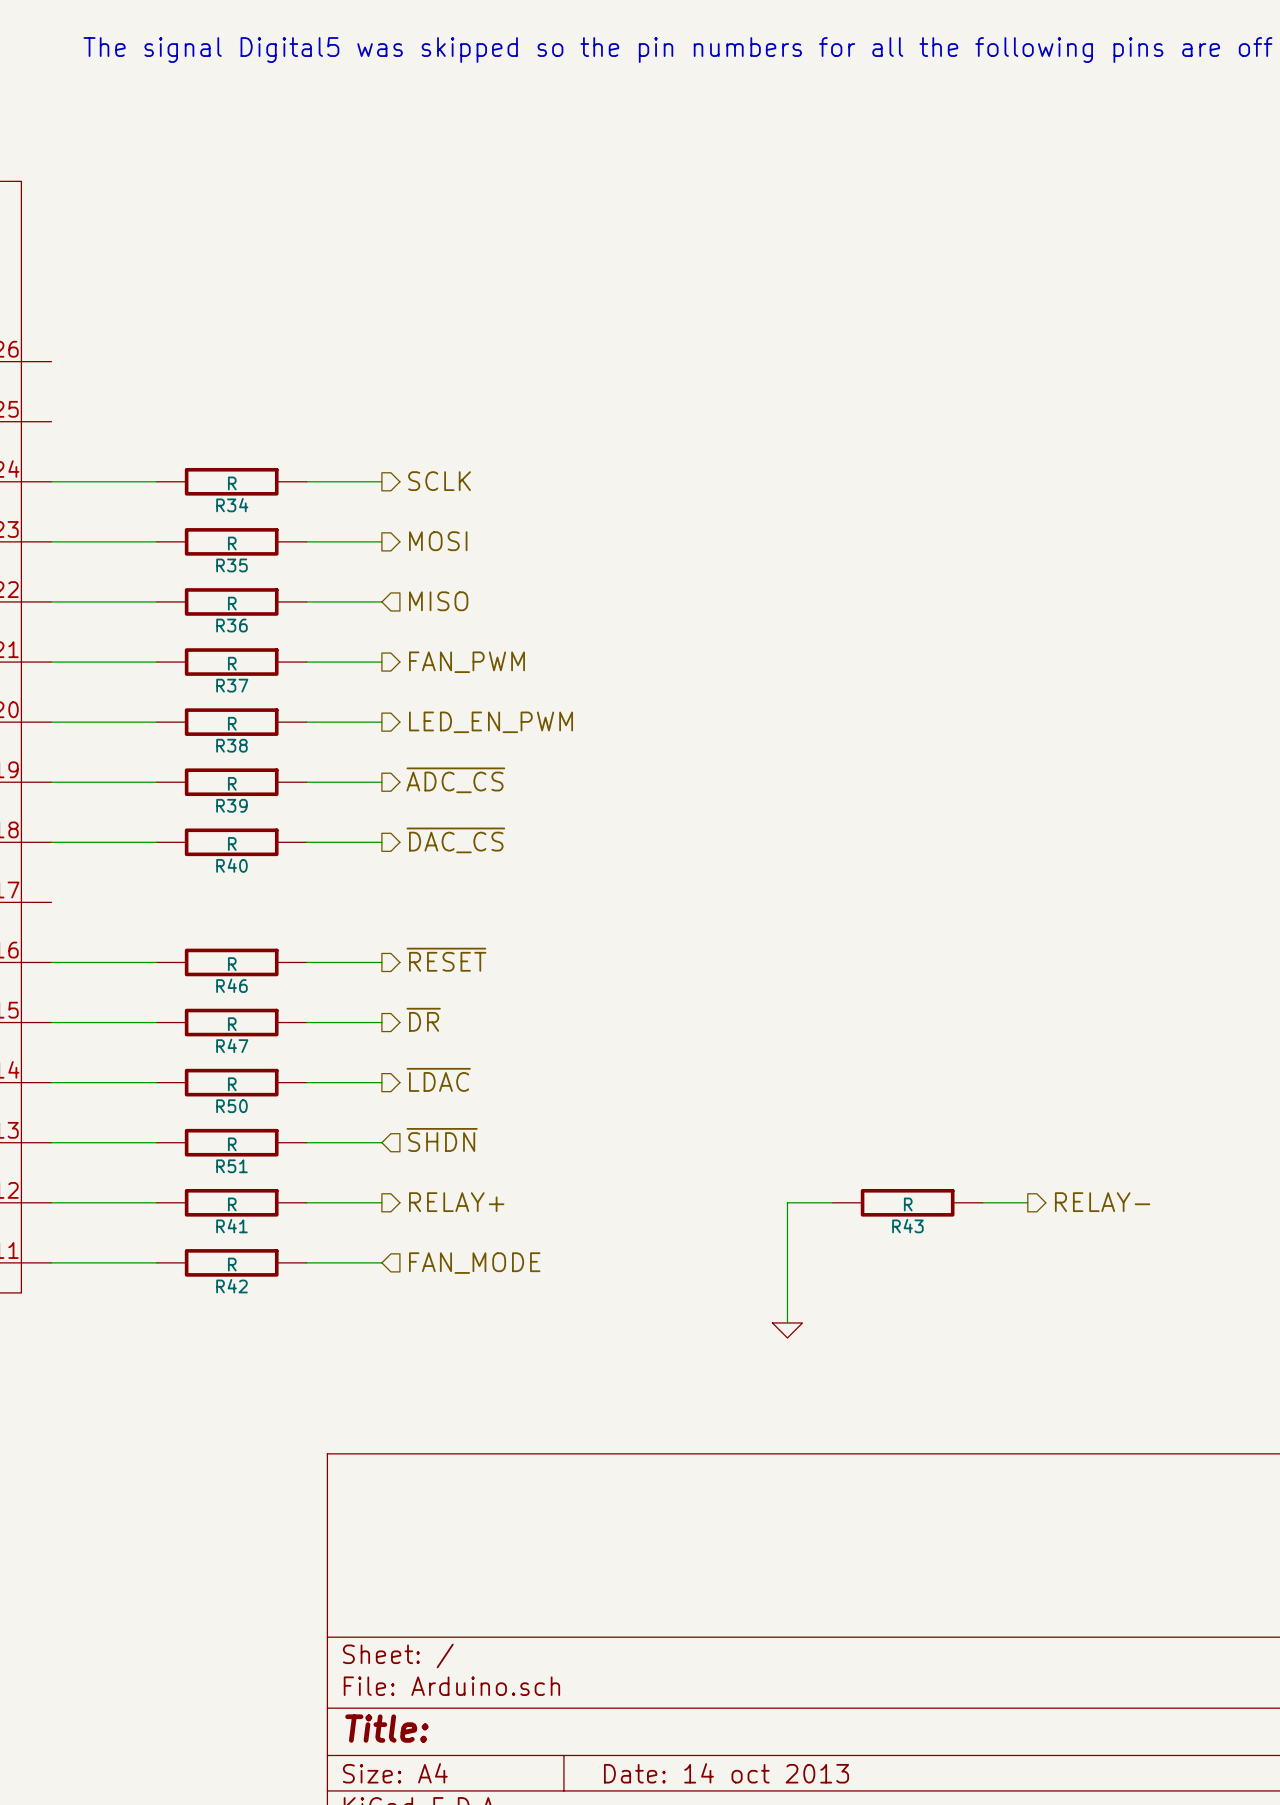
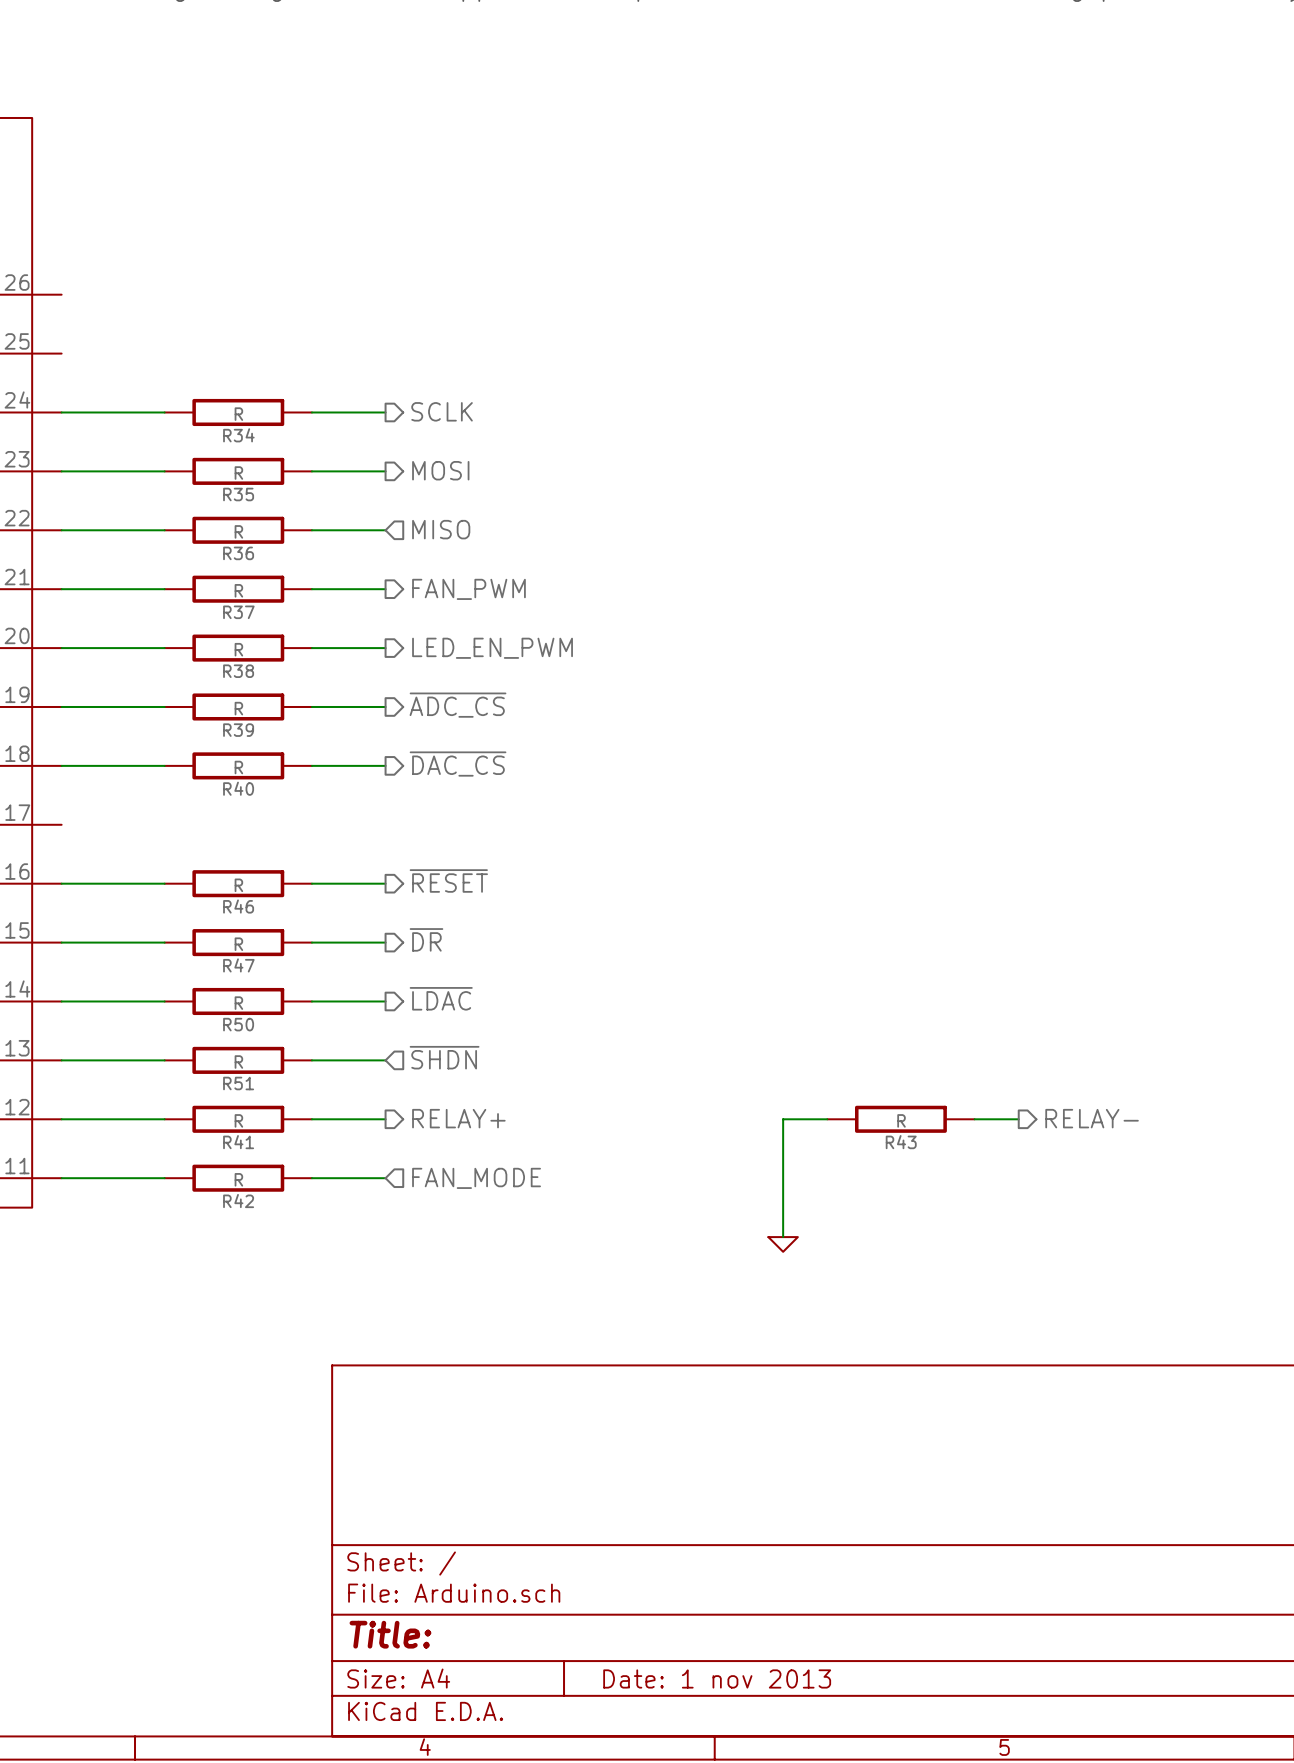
title block: Date: 14 oct 2013 (726, 1773) -> Date: 1 nov 2013 (717, 1678)

